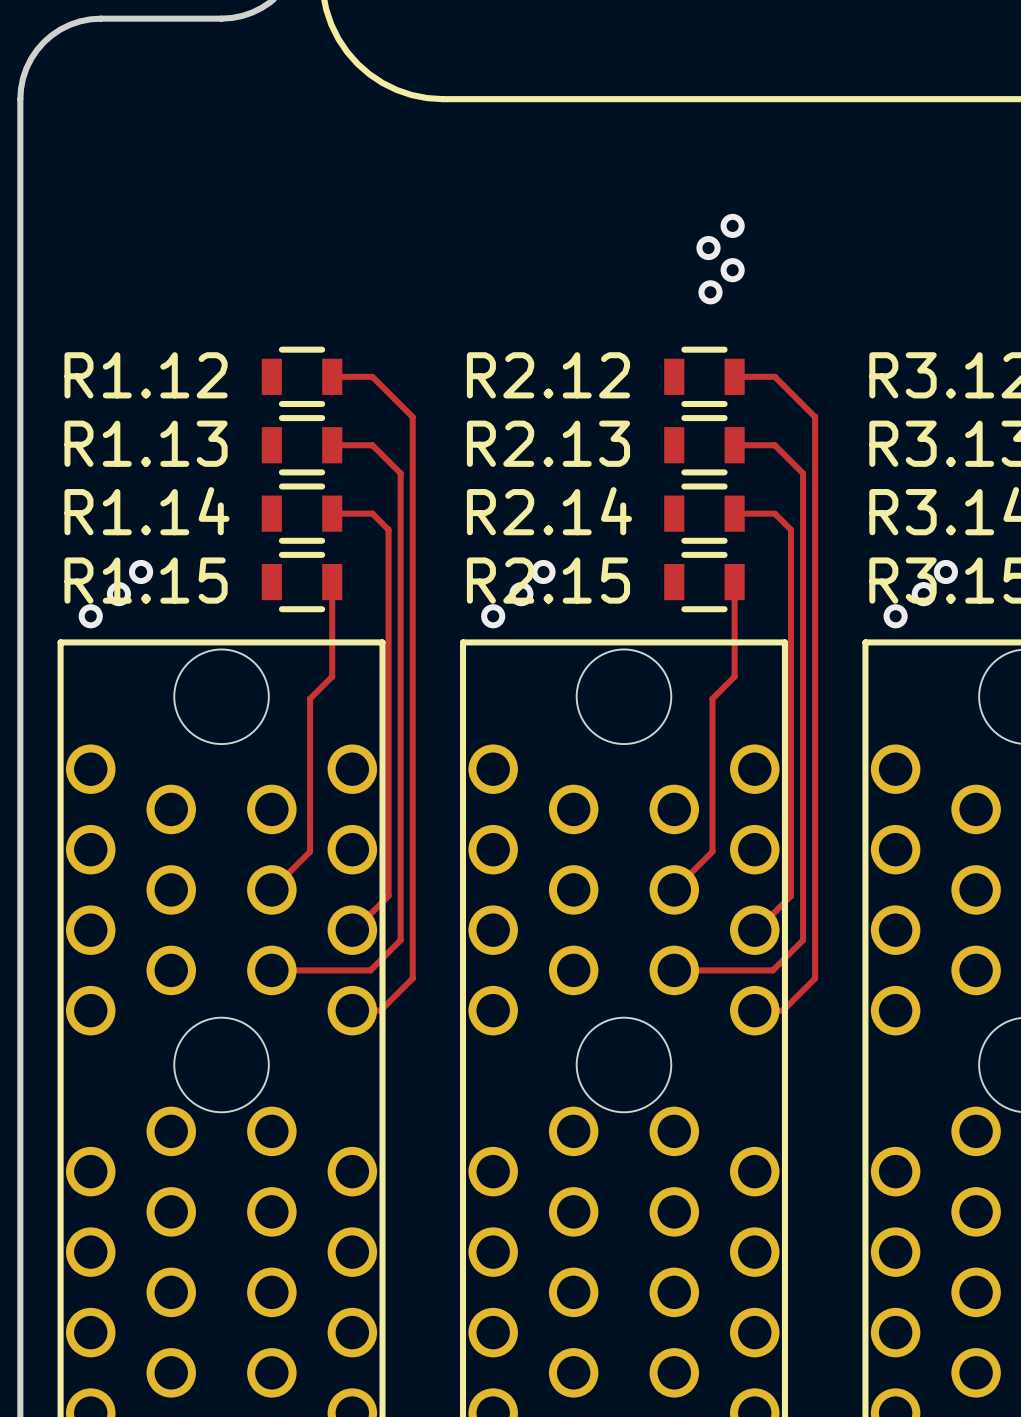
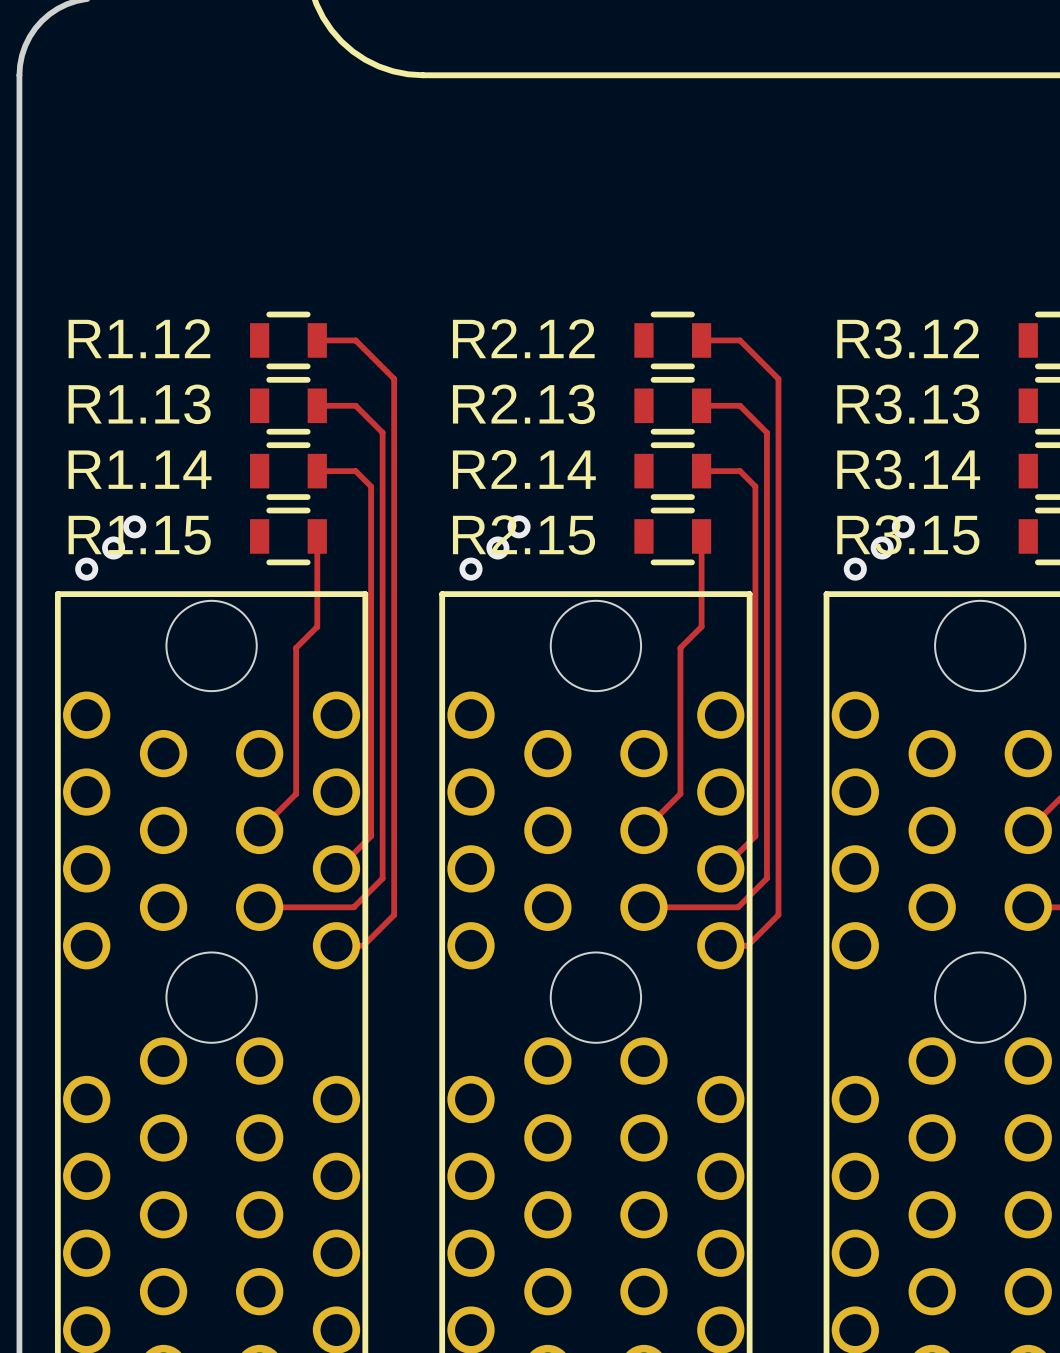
via: (732, 225) -> none
via: (708, 248) -> none
via: (732, 270) -> none
via: (710, 292) -> none

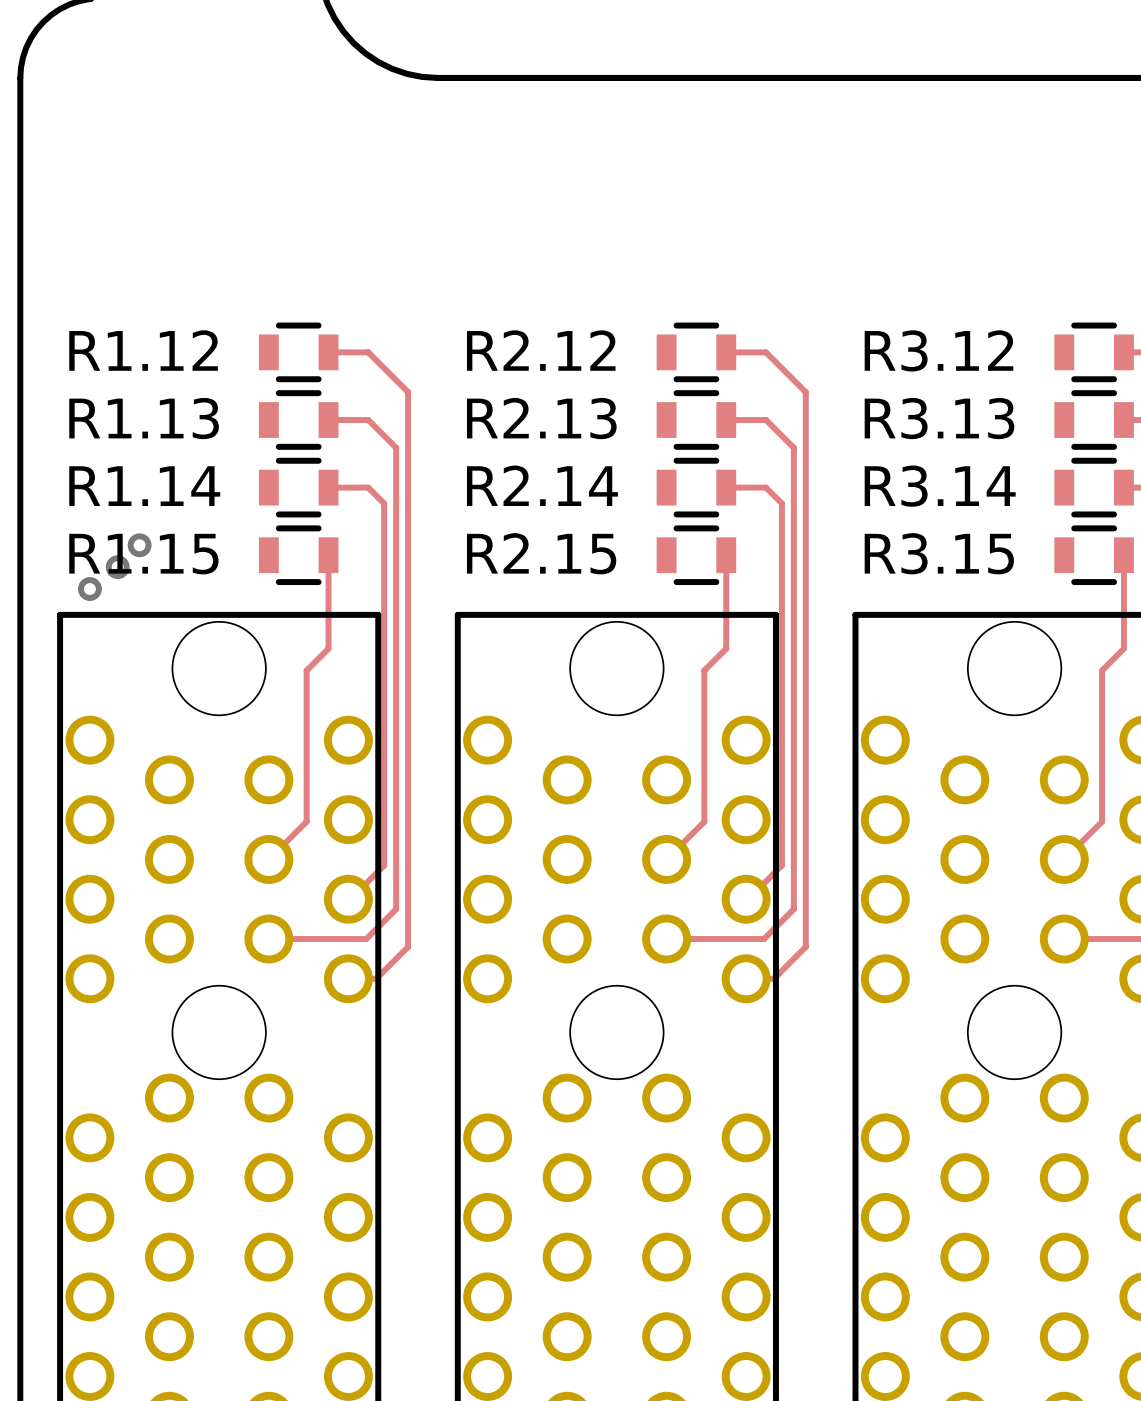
via: (519, 526) -> none
via: (903, 526) -> none
via: (497, 547) -> none
via: (882, 547) -> none
via: (471, 569) -> none
via: (855, 569) -> none

